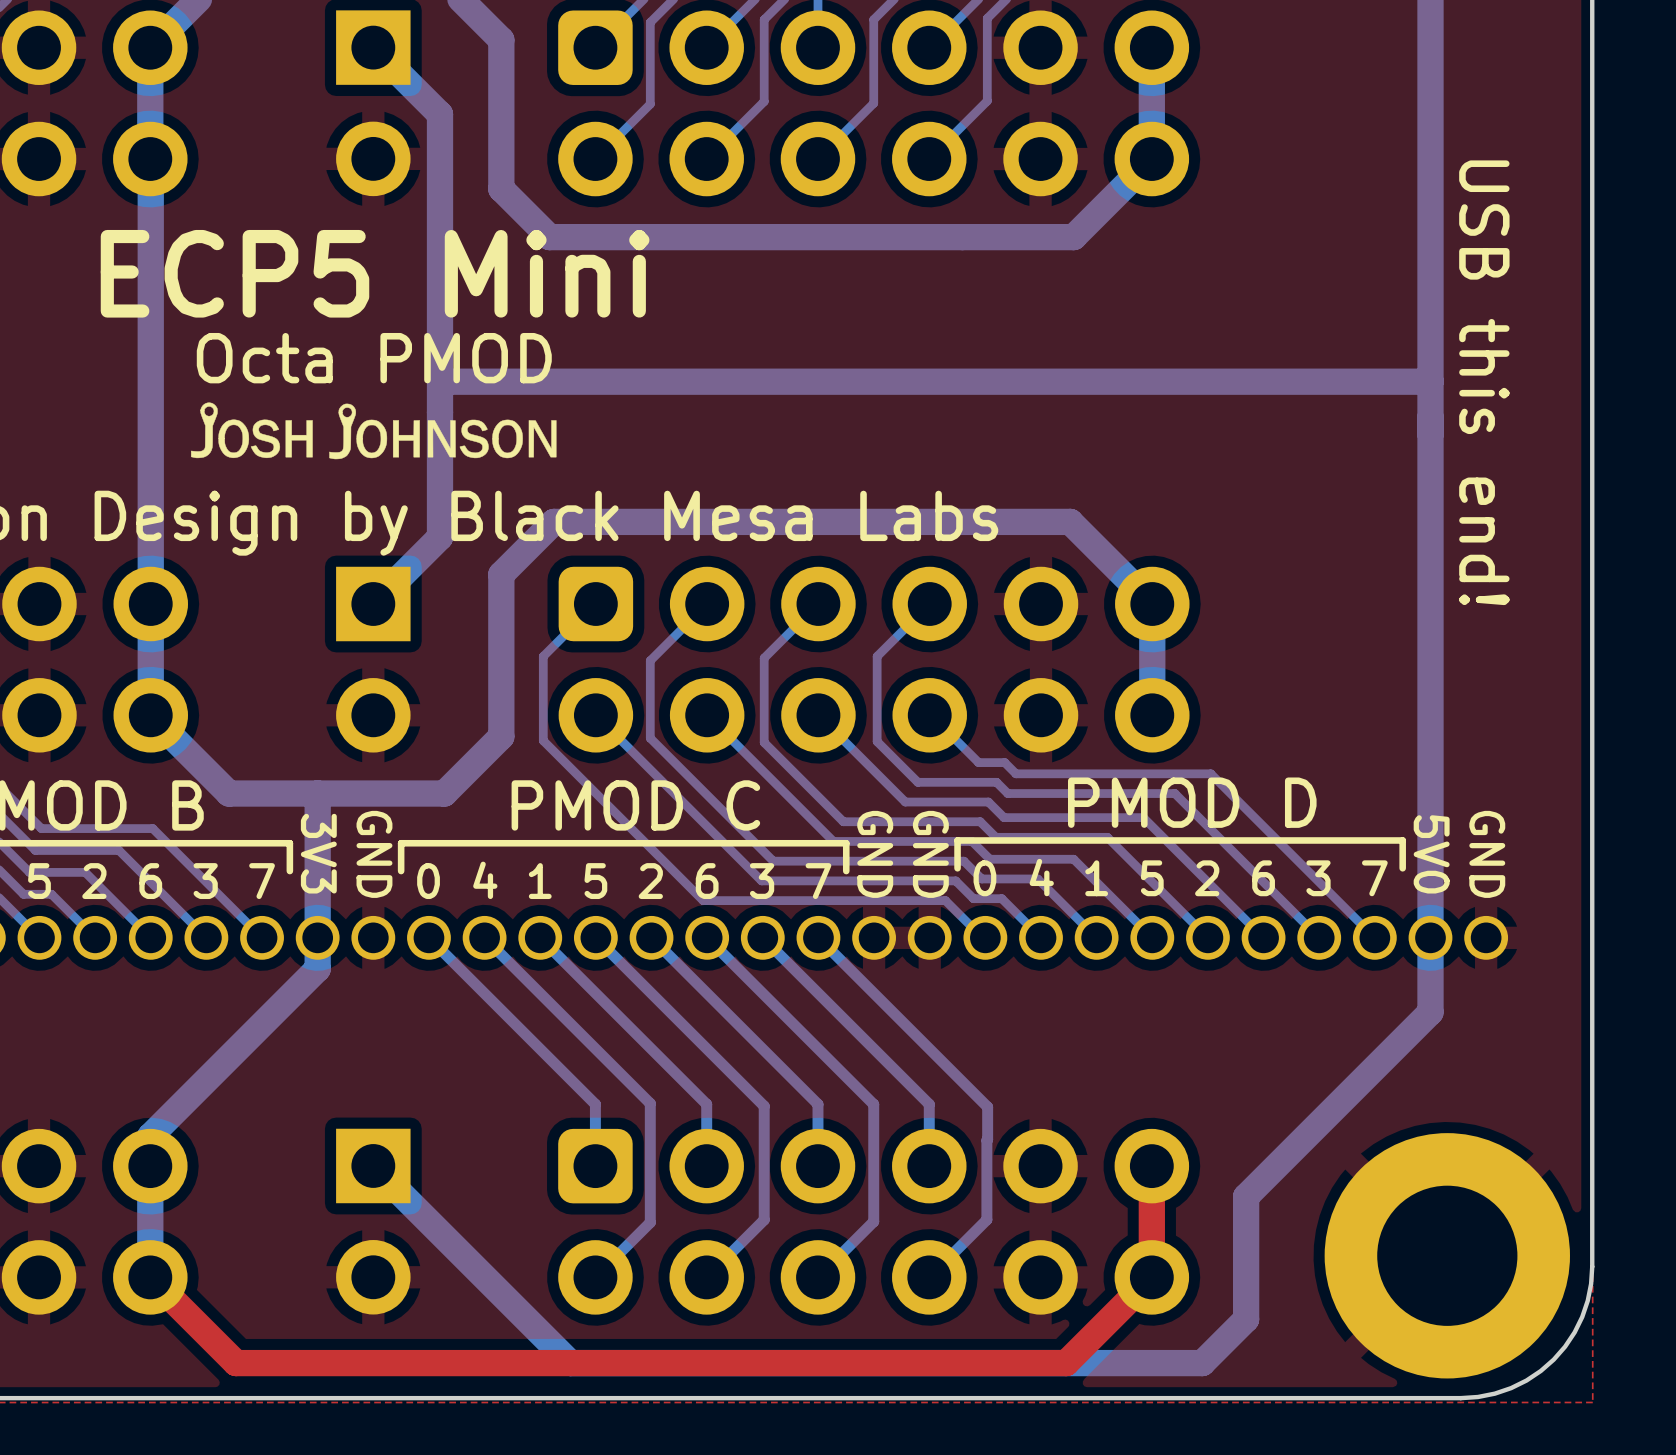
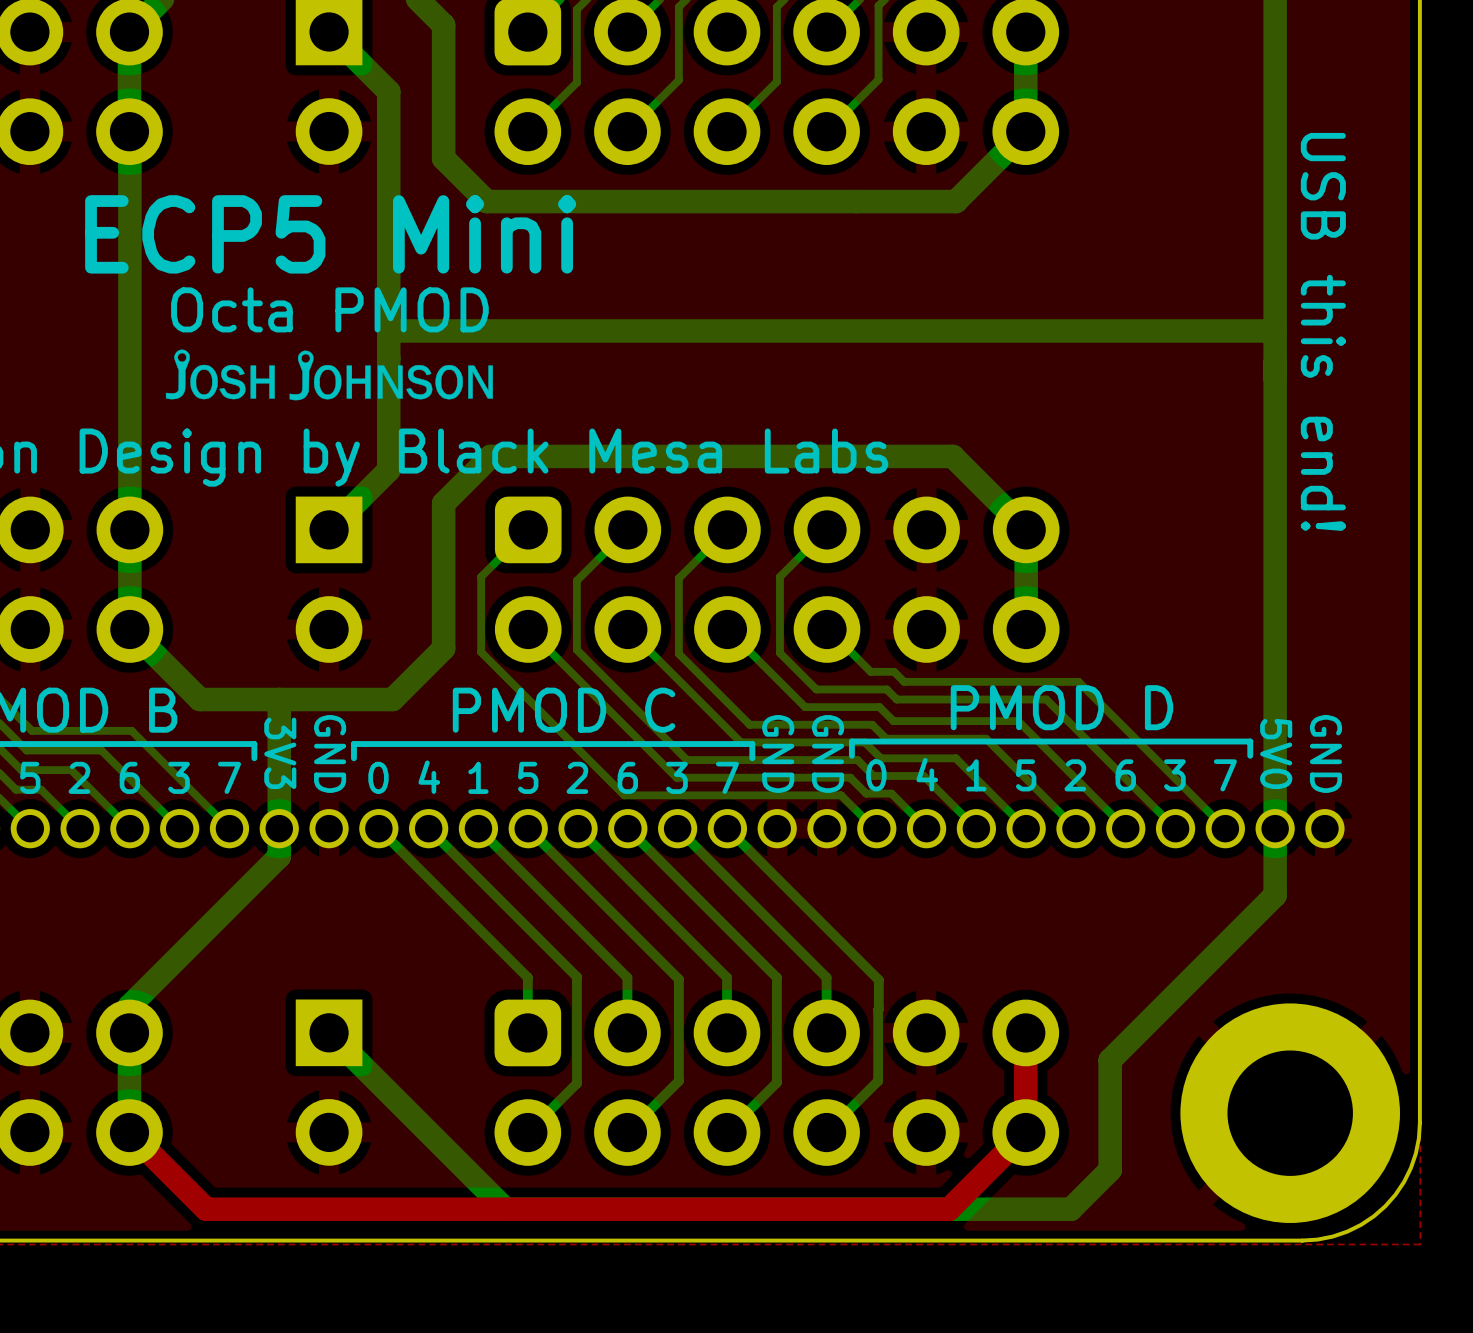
line: (957, 856) (957, 868) -> none
line: (1402, 856) (1402, 868) -> none
line: (289, 859) (289, 871) -> none
line: (401, 859) (401, 871) -> none
line: (846, 859) (846, 871) -> none

